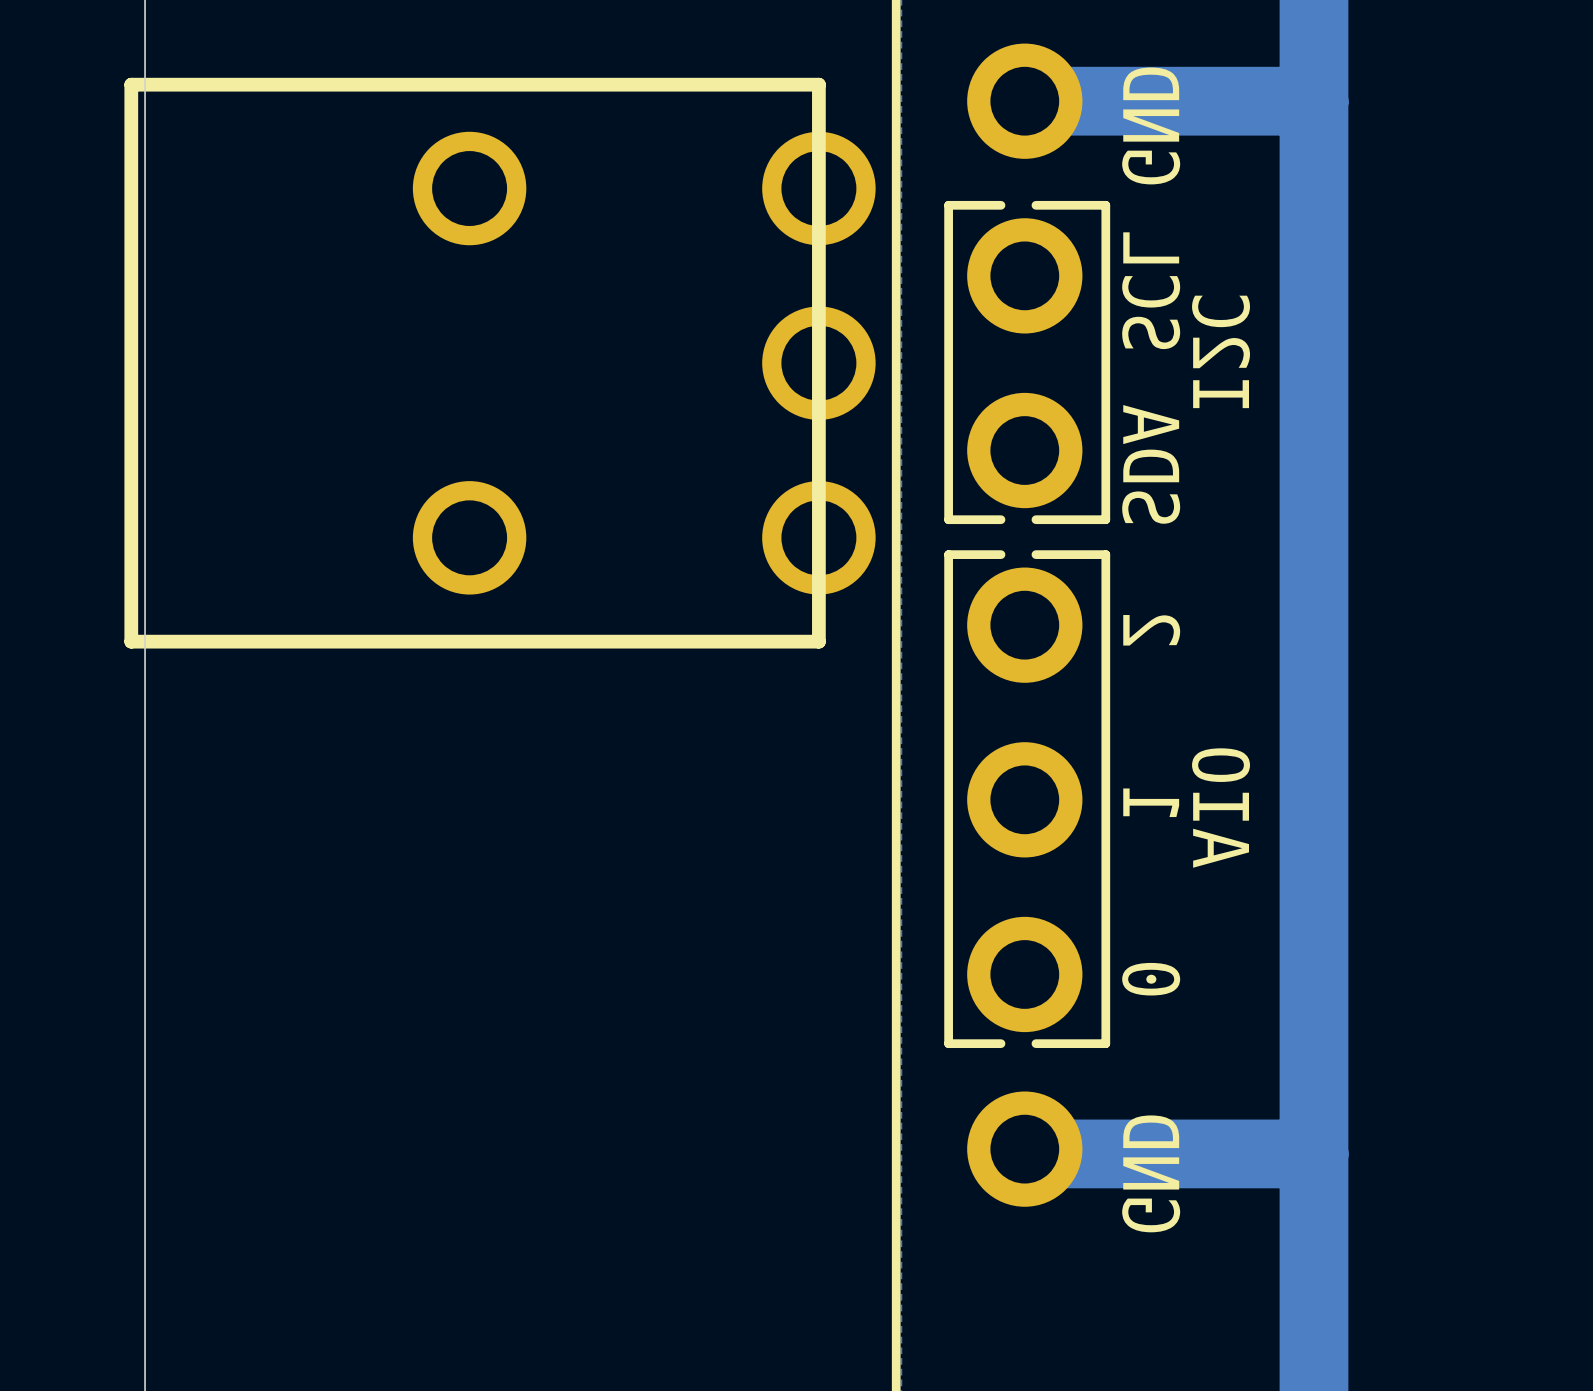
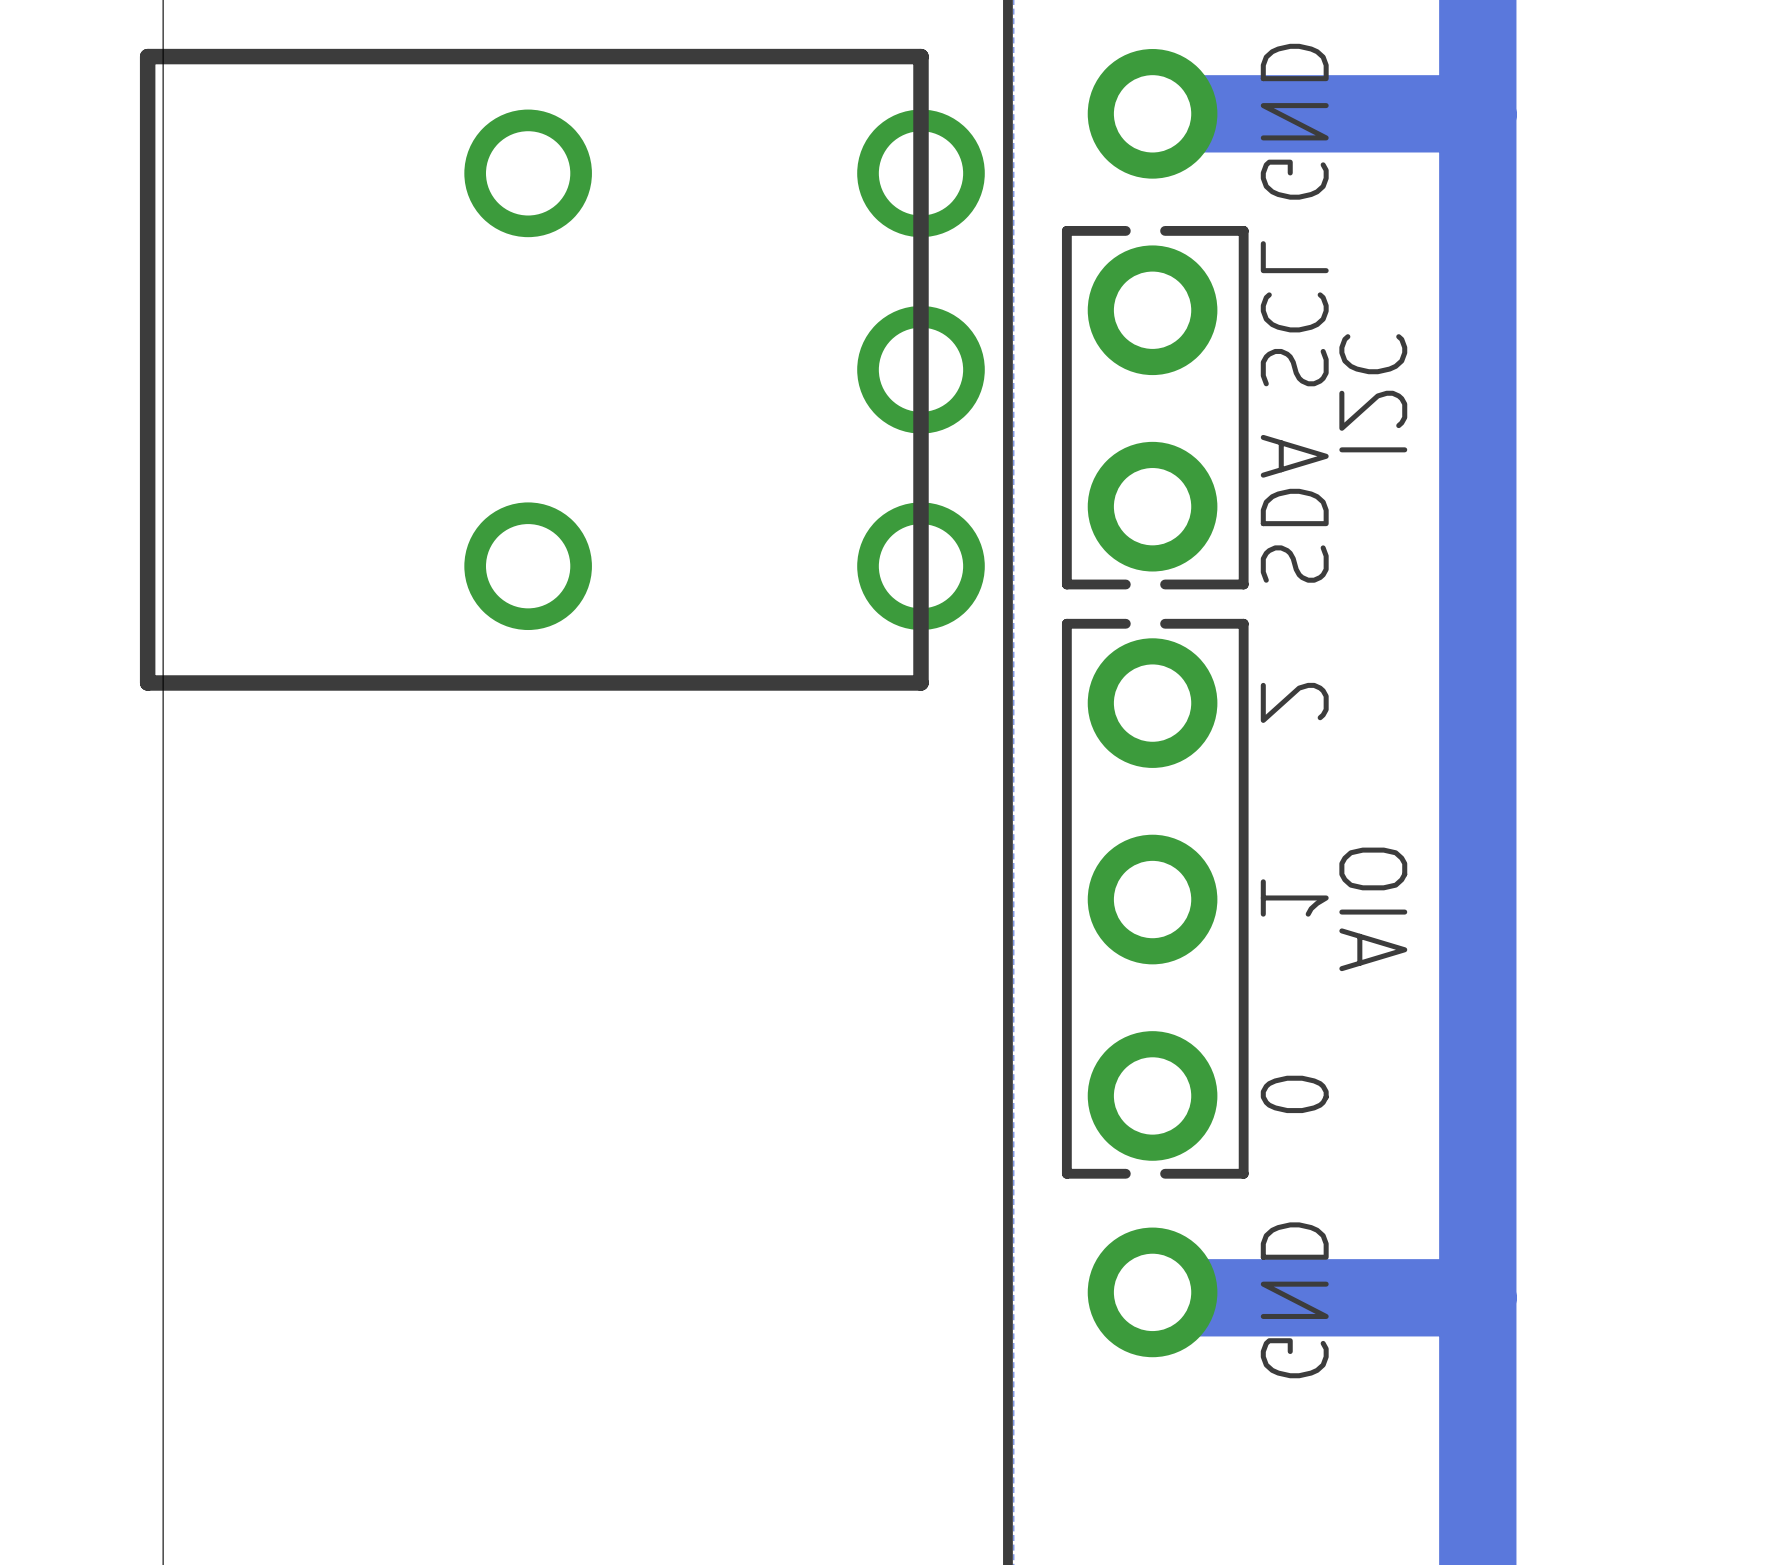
part position: (500, 363) -> (562, 369)

